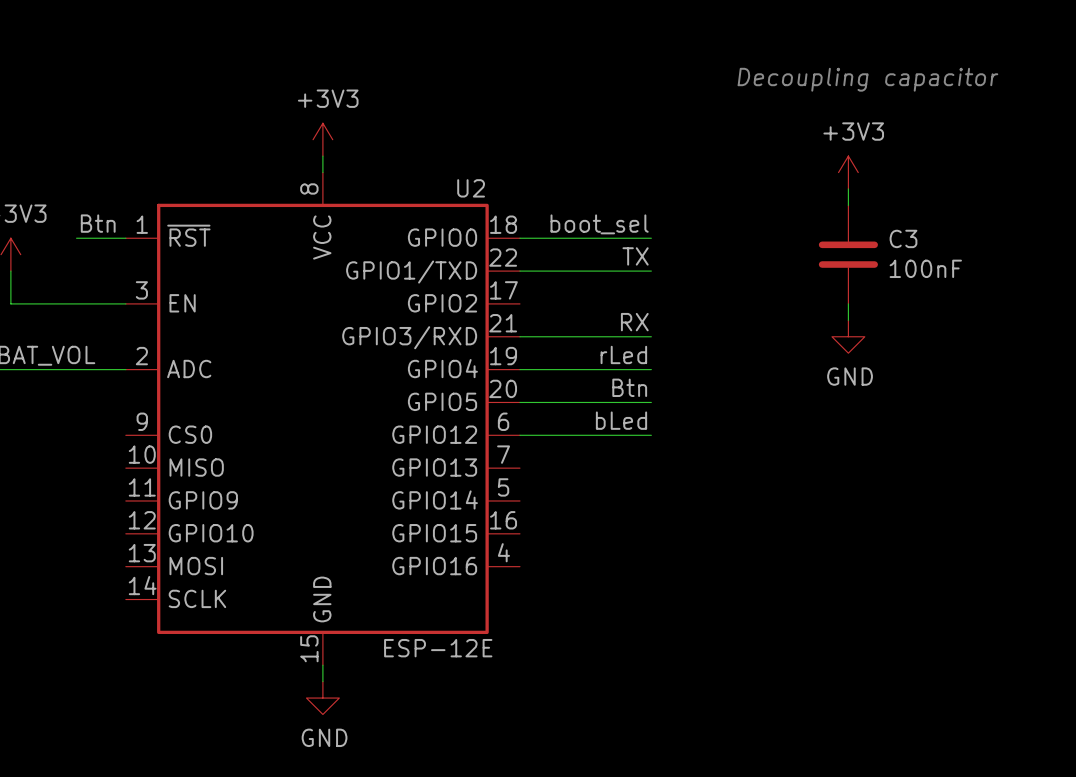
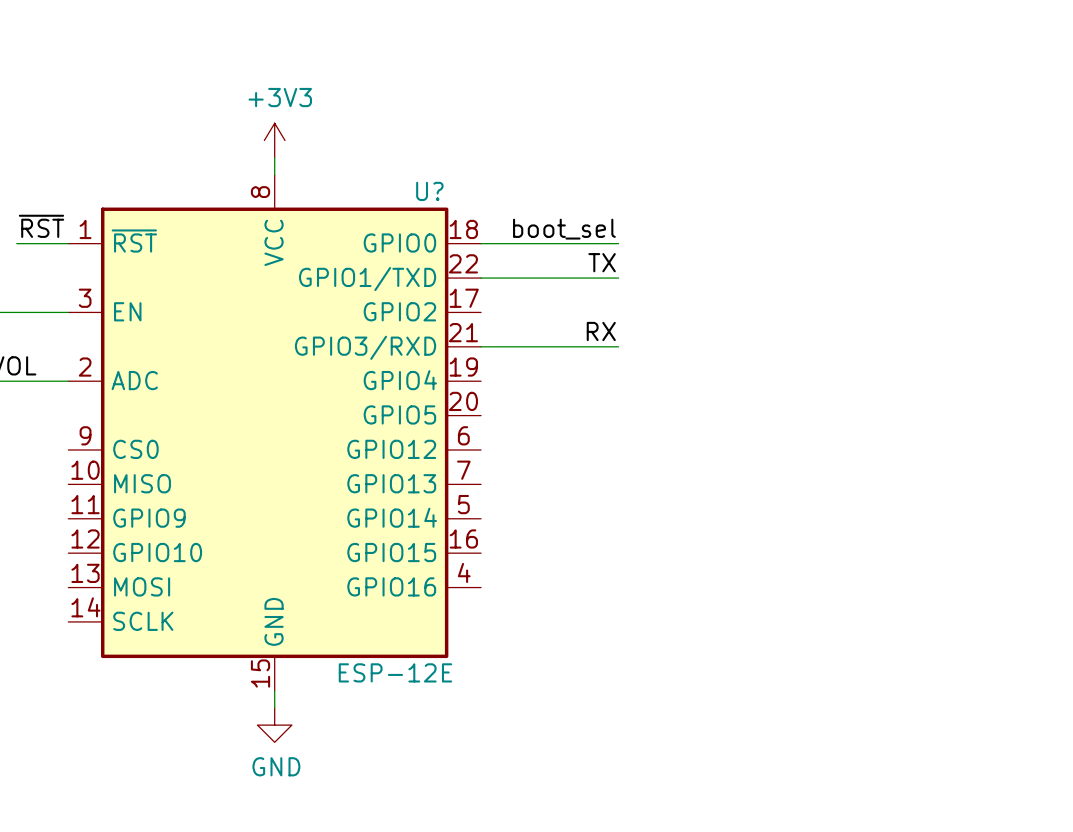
text: Decoupling capacitor (867, 79) -> none
power symbol: +3V3 (848, 172) -> none
U2 name: U2 (471, 188) -> U? (429, 191)
wire: (848, 188) (848, 205) -> none
label: Btn (98, 223) -> ~{RST} (41, 226)
C3: 100nF (848, 254) -> none
wire: (848, 303) (848, 320) -> none
power symbol: GND (848, 336) -> none
label: rLed (623, 354) -> none
wire: (519, 369) (651, 369) -> none
label: Btn (629, 387) -> none
wire: (519, 402) (651, 402) -> none
label: bLed (621, 420) -> none
wire: (519, 435) (651, 435) -> none

